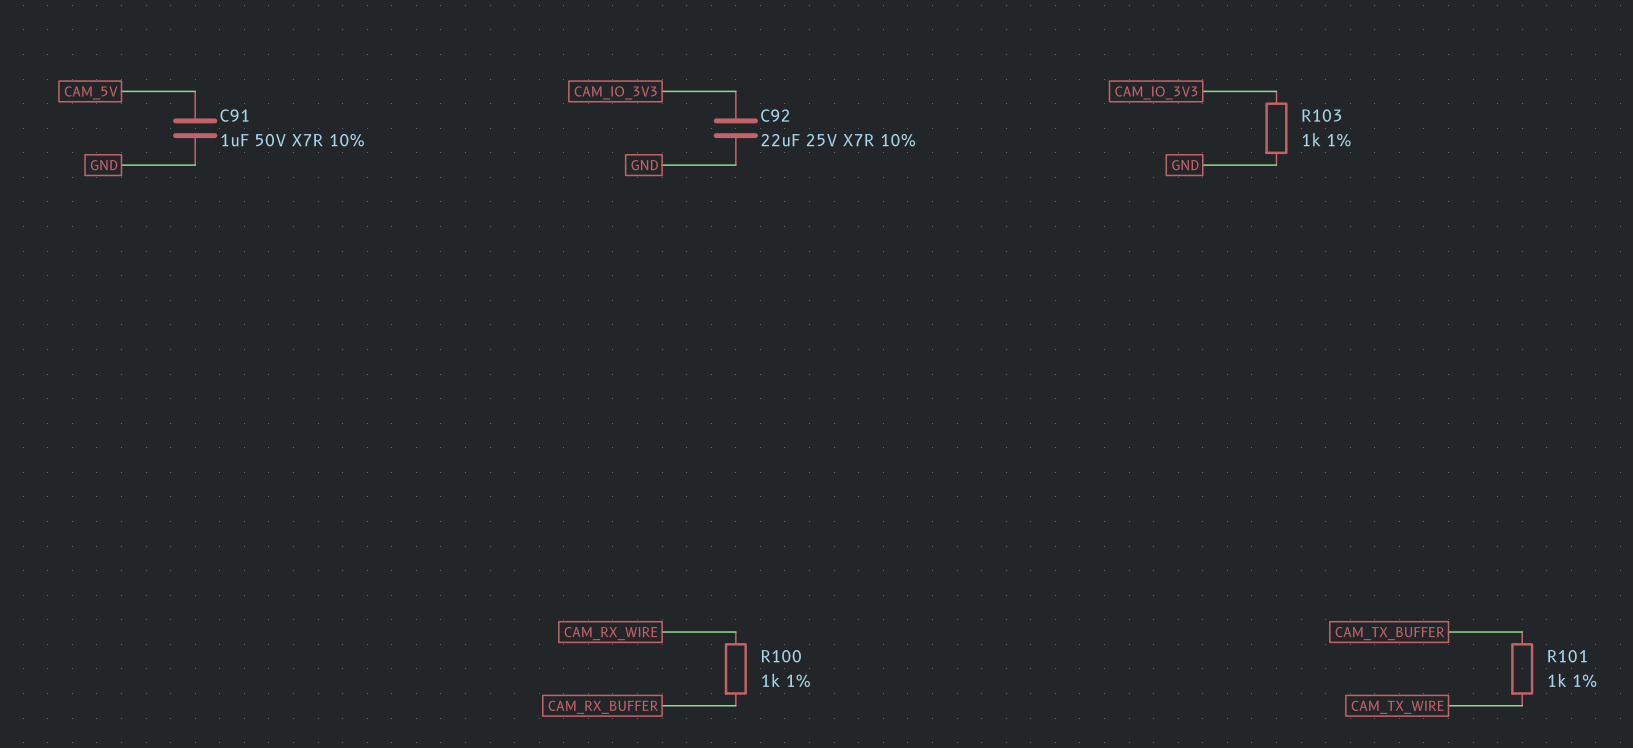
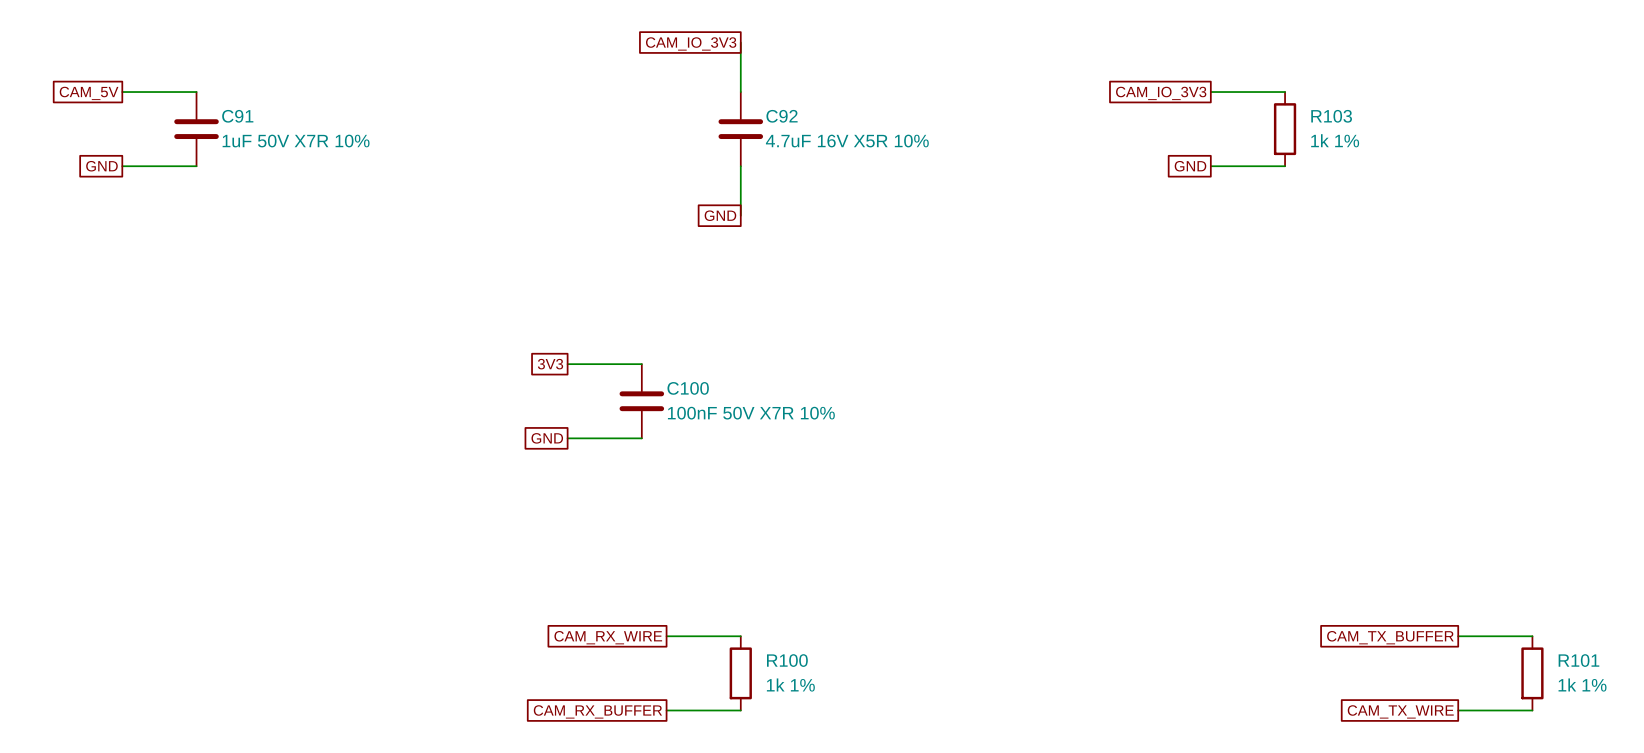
wire: (662, 91) (735, 91) -> (740, 42) (740, 92)
global label position: CAM_IO_3V3 (615, 92) -> CAM_IO_3V3 (691, 43)
C92 value: 22uF 25V X7R 10% (838, 140) -> 4.7uF 16V X5R 10% (847, 141)
global label position: GND (644, 165) -> GND (720, 215)
wire: (662, 165) (735, 165) -> (740, 215) (740, 166)
global label: none -> 3V3 (550, 364)
wire: none -> (567, 364) (641, 364)
C100: none -> 100nF 50V X7R 10% (641, 401)
global label: none -> GND (547, 438)
wire: none -> (567, 438) (641, 438)

